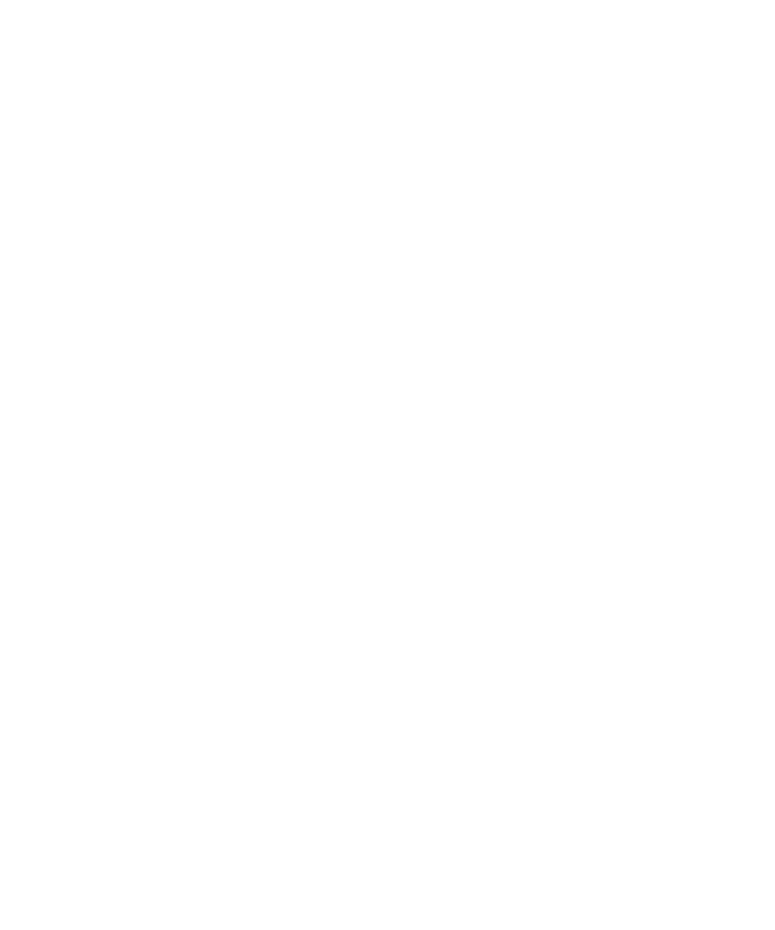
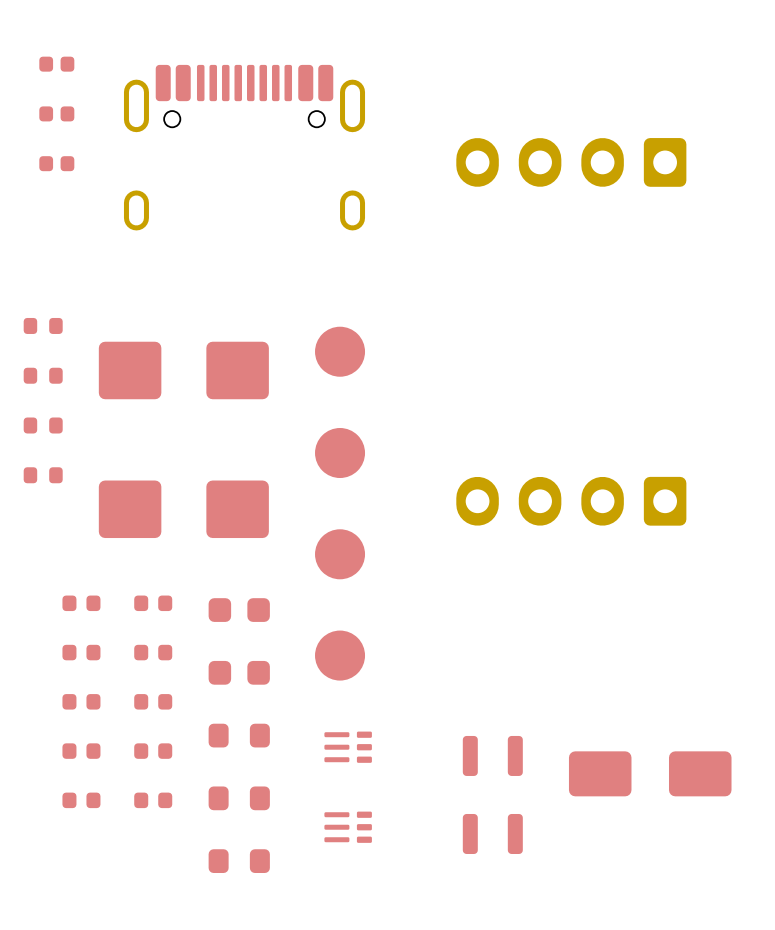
part: none -> (56, 64)
part: none -> (56, 113)
part: none -> (244, 147)
part: none -> (571, 162)
part: none -> (56, 163)
part: none -> (43, 325)
part: none -> (340, 351)
part: none -> (183, 370)
part: none -> (43, 375)
part: none -> (43, 425)
part: none -> (340, 453)
part: none -> (43, 475)
part: none -> (571, 501)
part: none -> (183, 509)
part: none -> (340, 554)
part: none -> (81, 603)
part: none -> (153, 603)
part: none -> (239, 610)
part: none -> (81, 652)
part: none -> (153, 652)
part: none -> (340, 655)
part: none -> (239, 672)
part: none -> (81, 701)
part: none -> (153, 701)
part: none -> (239, 735)
part: none -> (348, 747)
part: none -> (81, 751)
part: none -> (153, 751)
part: none -> (492, 755)
part: none -> (650, 773)
part: none -> (239, 798)
part: none -> (81, 800)
part: none -> (153, 800)
part: none -> (348, 827)
part: none -> (492, 833)
part: none -> (239, 861)

